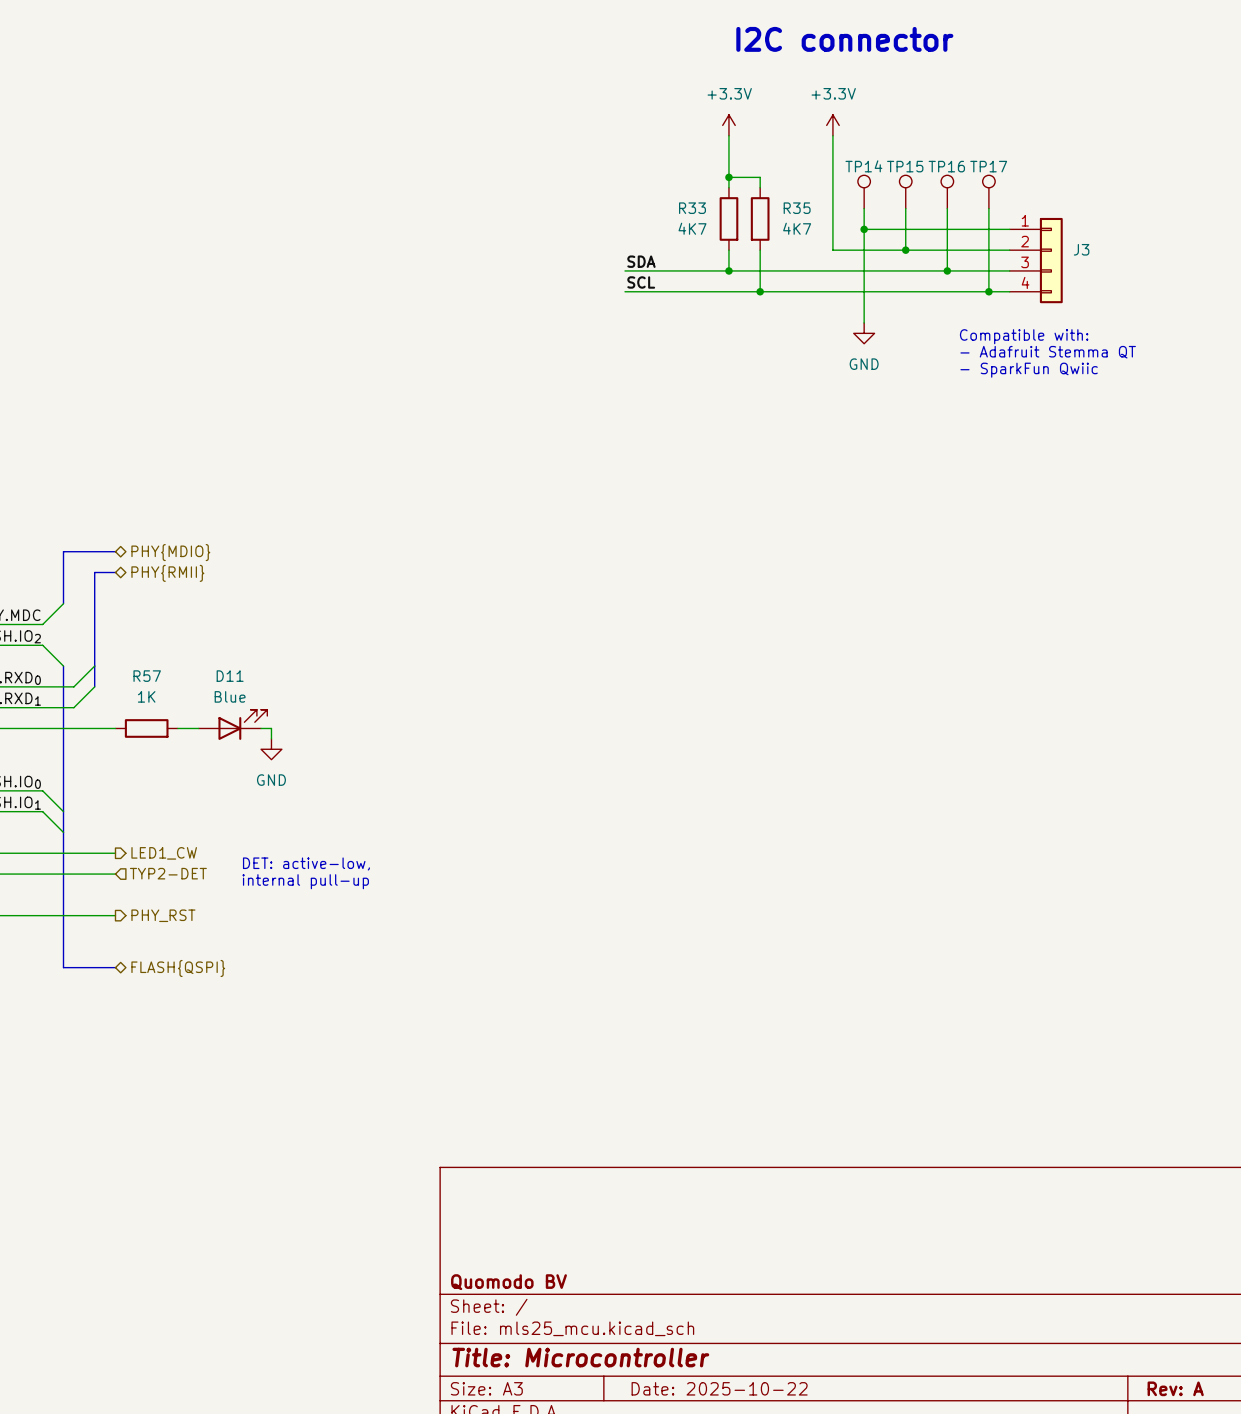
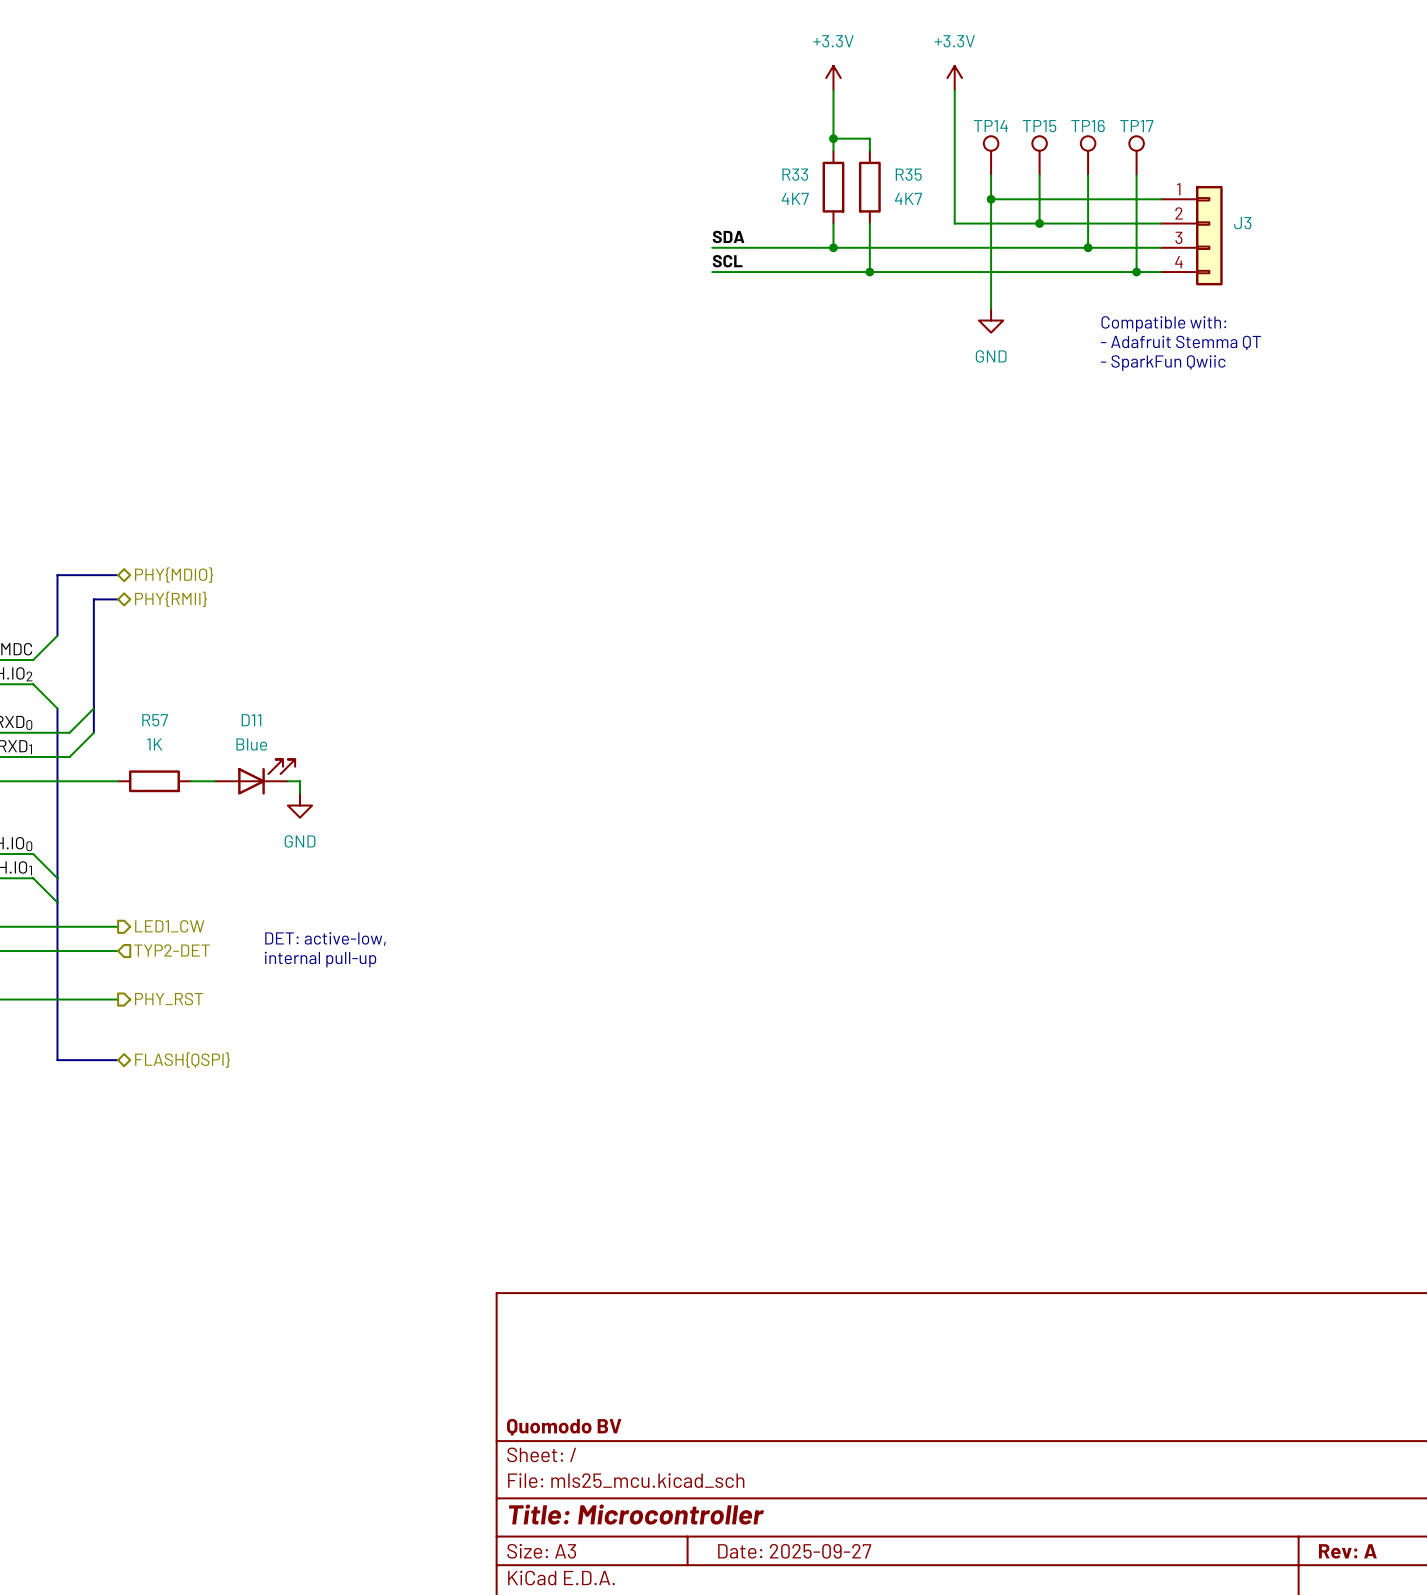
title block: Date: 2025-10-22 (719, 1388) -> Date: 2025-09-27 (794, 1551)

